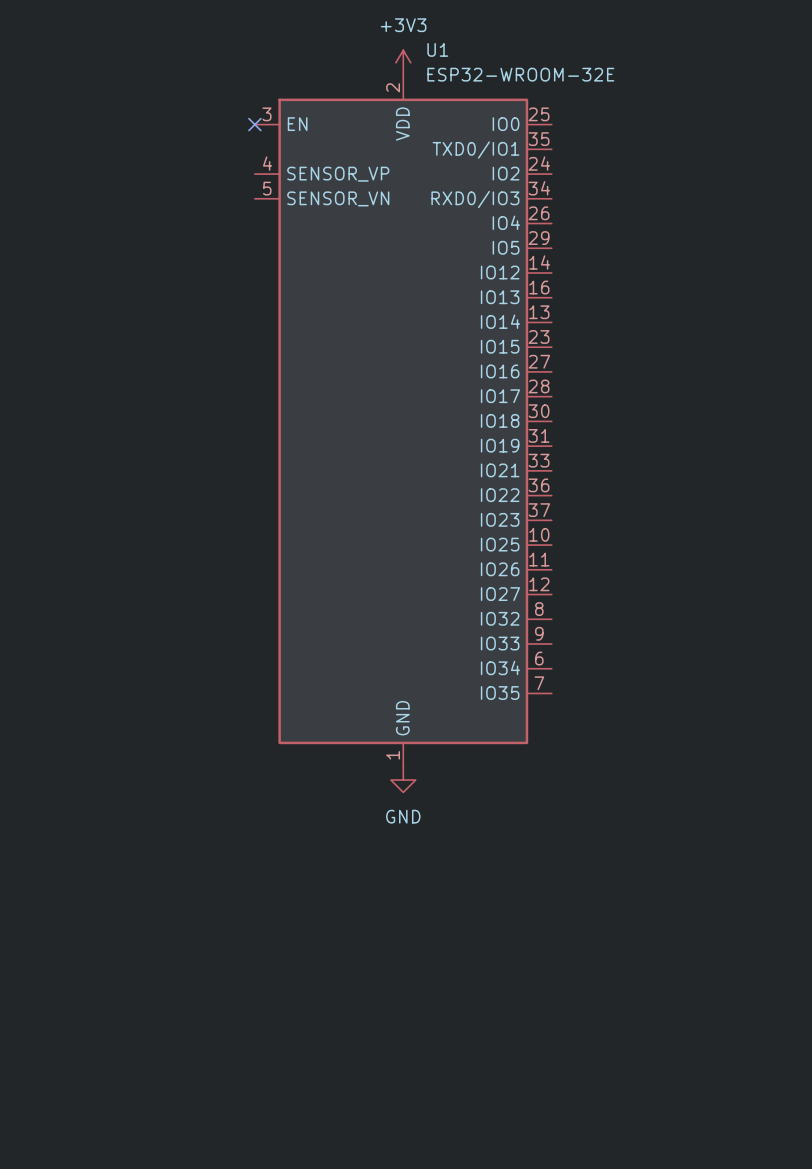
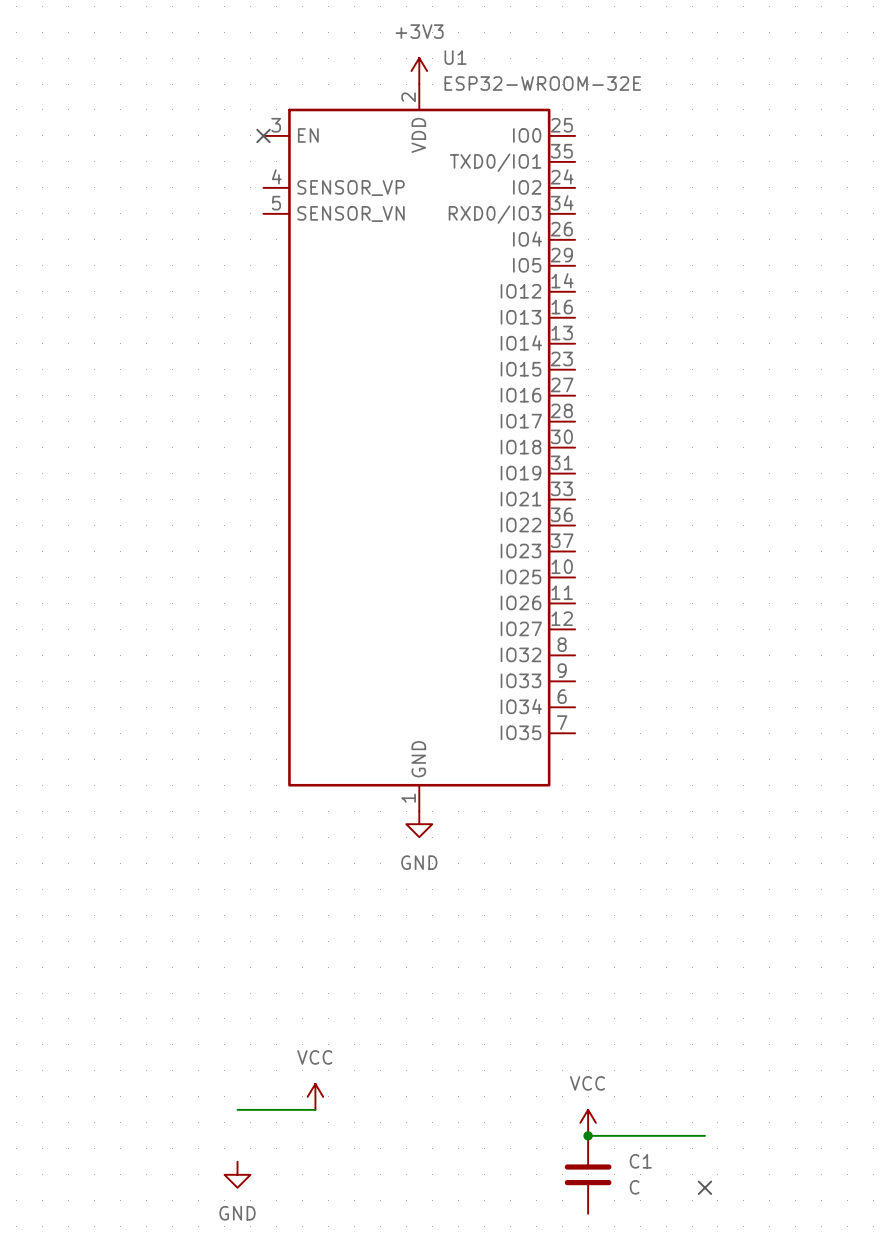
power symbol: none -> VCC (315, 1096)
wire: none -> (237, 1109) (315, 1109)
power symbol: none -> VCC (588, 1122)
wire: none -> (588, 1135) (704, 1135)
junction: none -> (588, 1135)
power symbol: none -> GND (237, 1174)
C1: none -> C (588, 1174)
no-connect mark: none -> (704, 1187)

